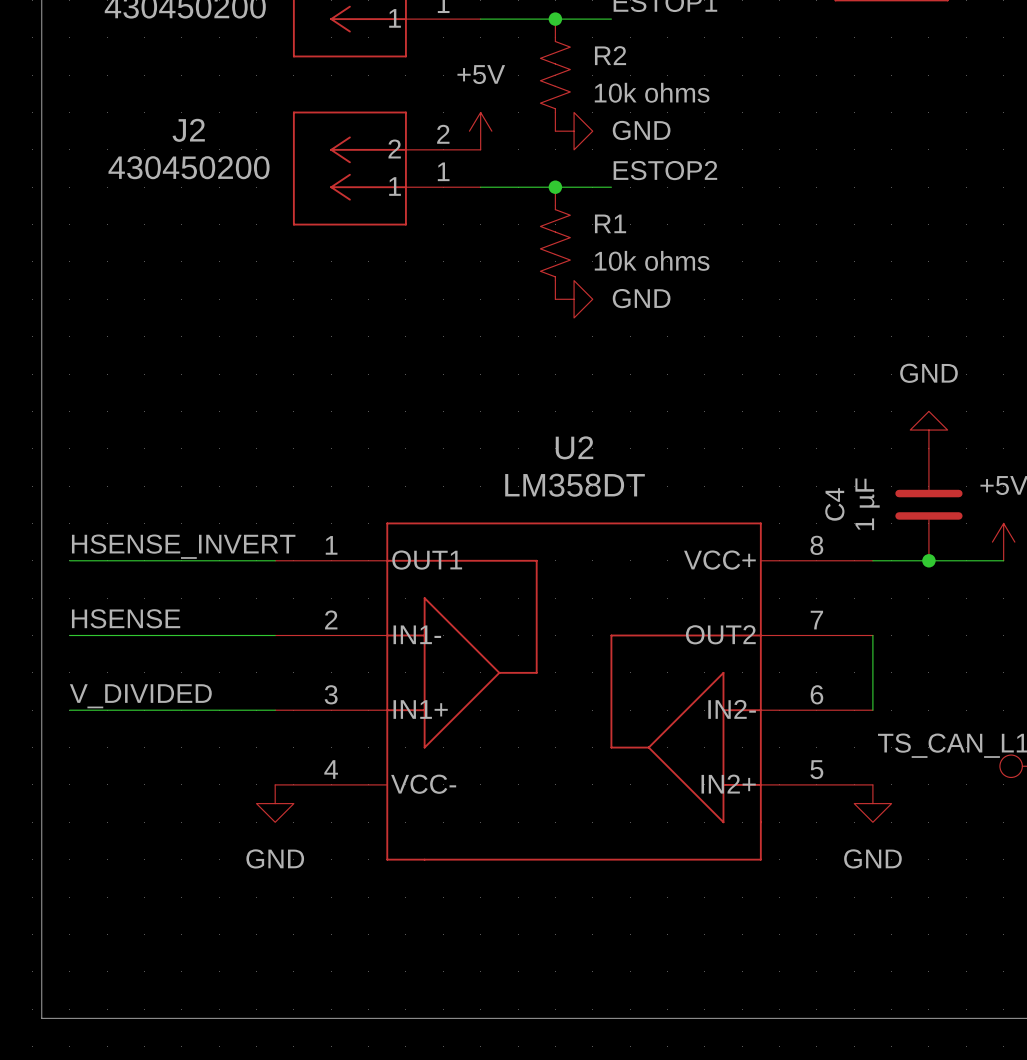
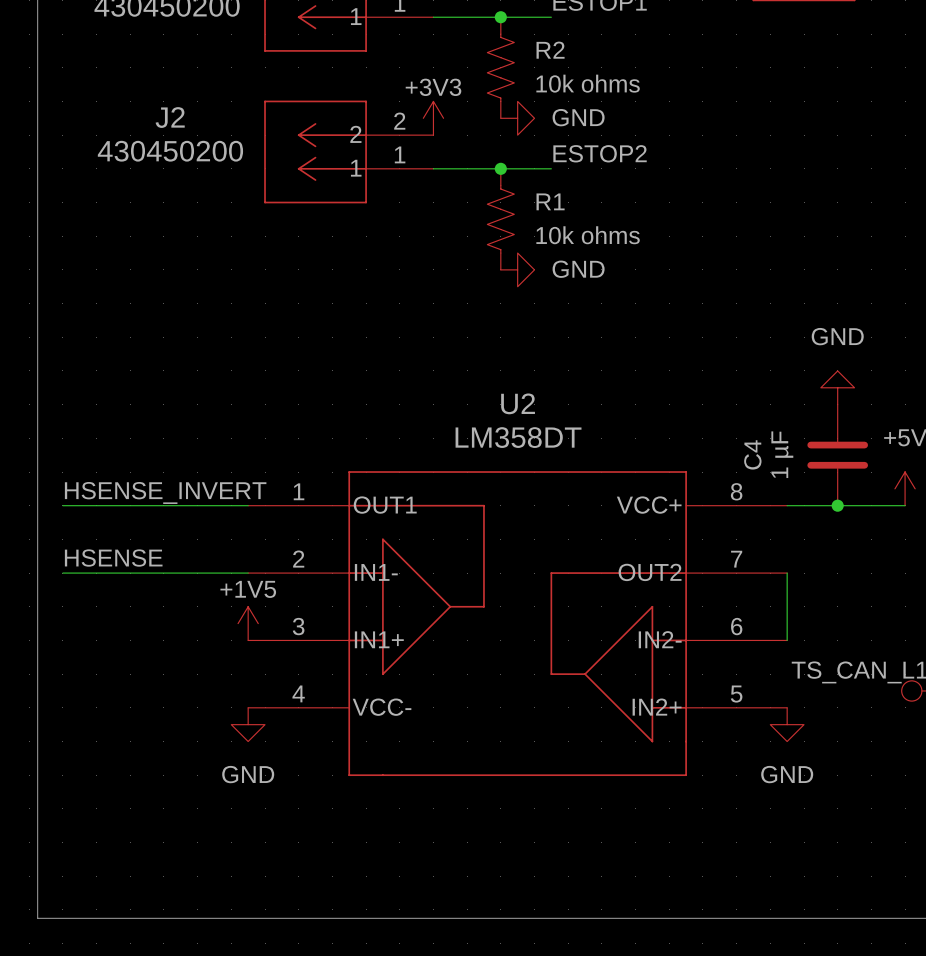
power symbol: +5V (480, 131) -> +3V3 (433, 118)
power symbol: none -> +1V5 (248, 623)
label: V_DIVIDED (140, 696) -> none
wire: (69, 710) (275, 710) -> none

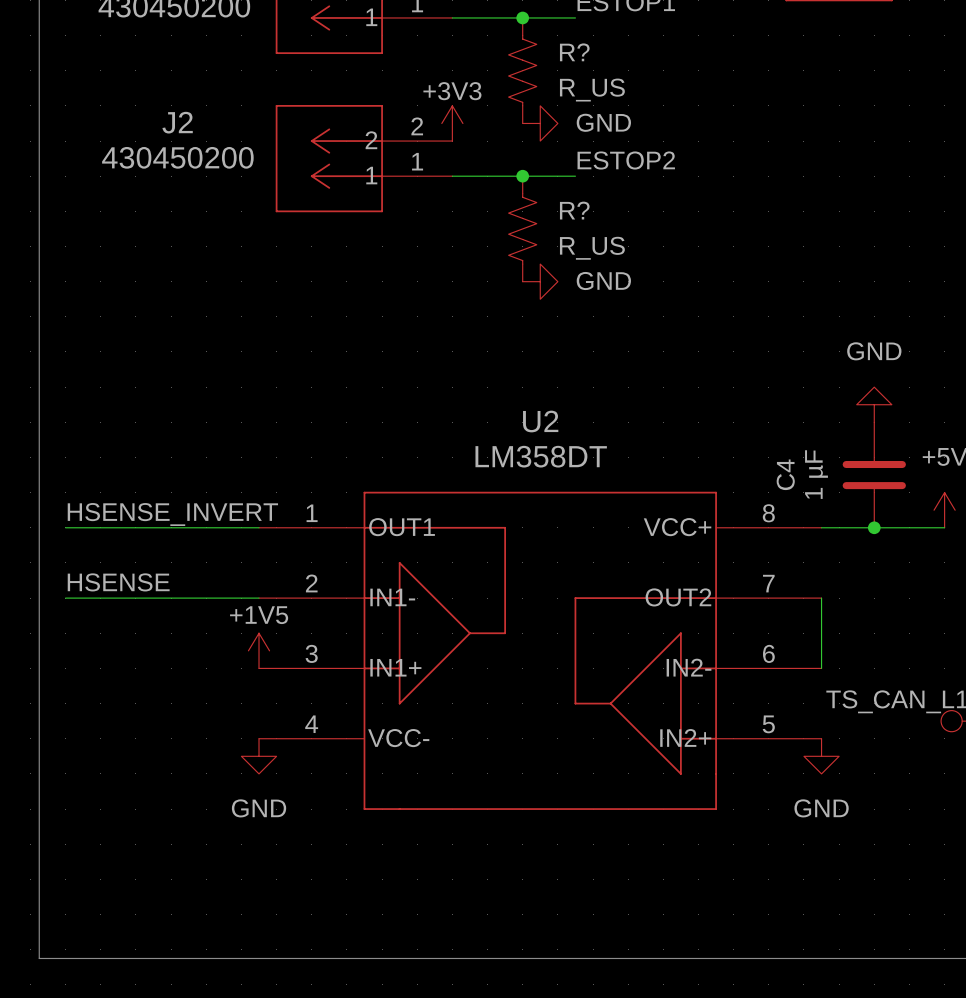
R2 name: R2 (550, 50) -> R? (574, 52)
R2 value: 10k ohms (588, 83) -> R_US (592, 90)
R1 name: R1 (550, 201) -> R? (574, 210)
R1 value: 10k ohms (588, 235) -> R_US (592, 248)

